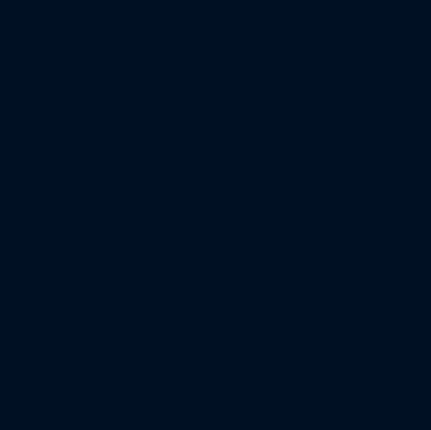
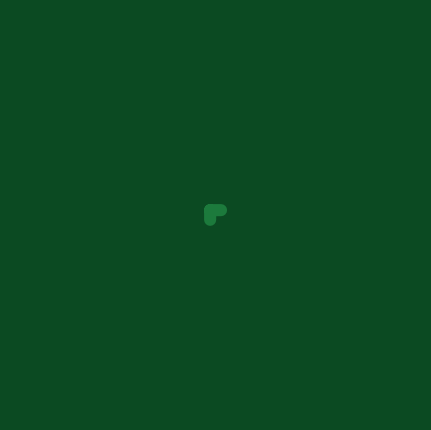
track: none -> (221, 210) (210, 210) (210, 219)

